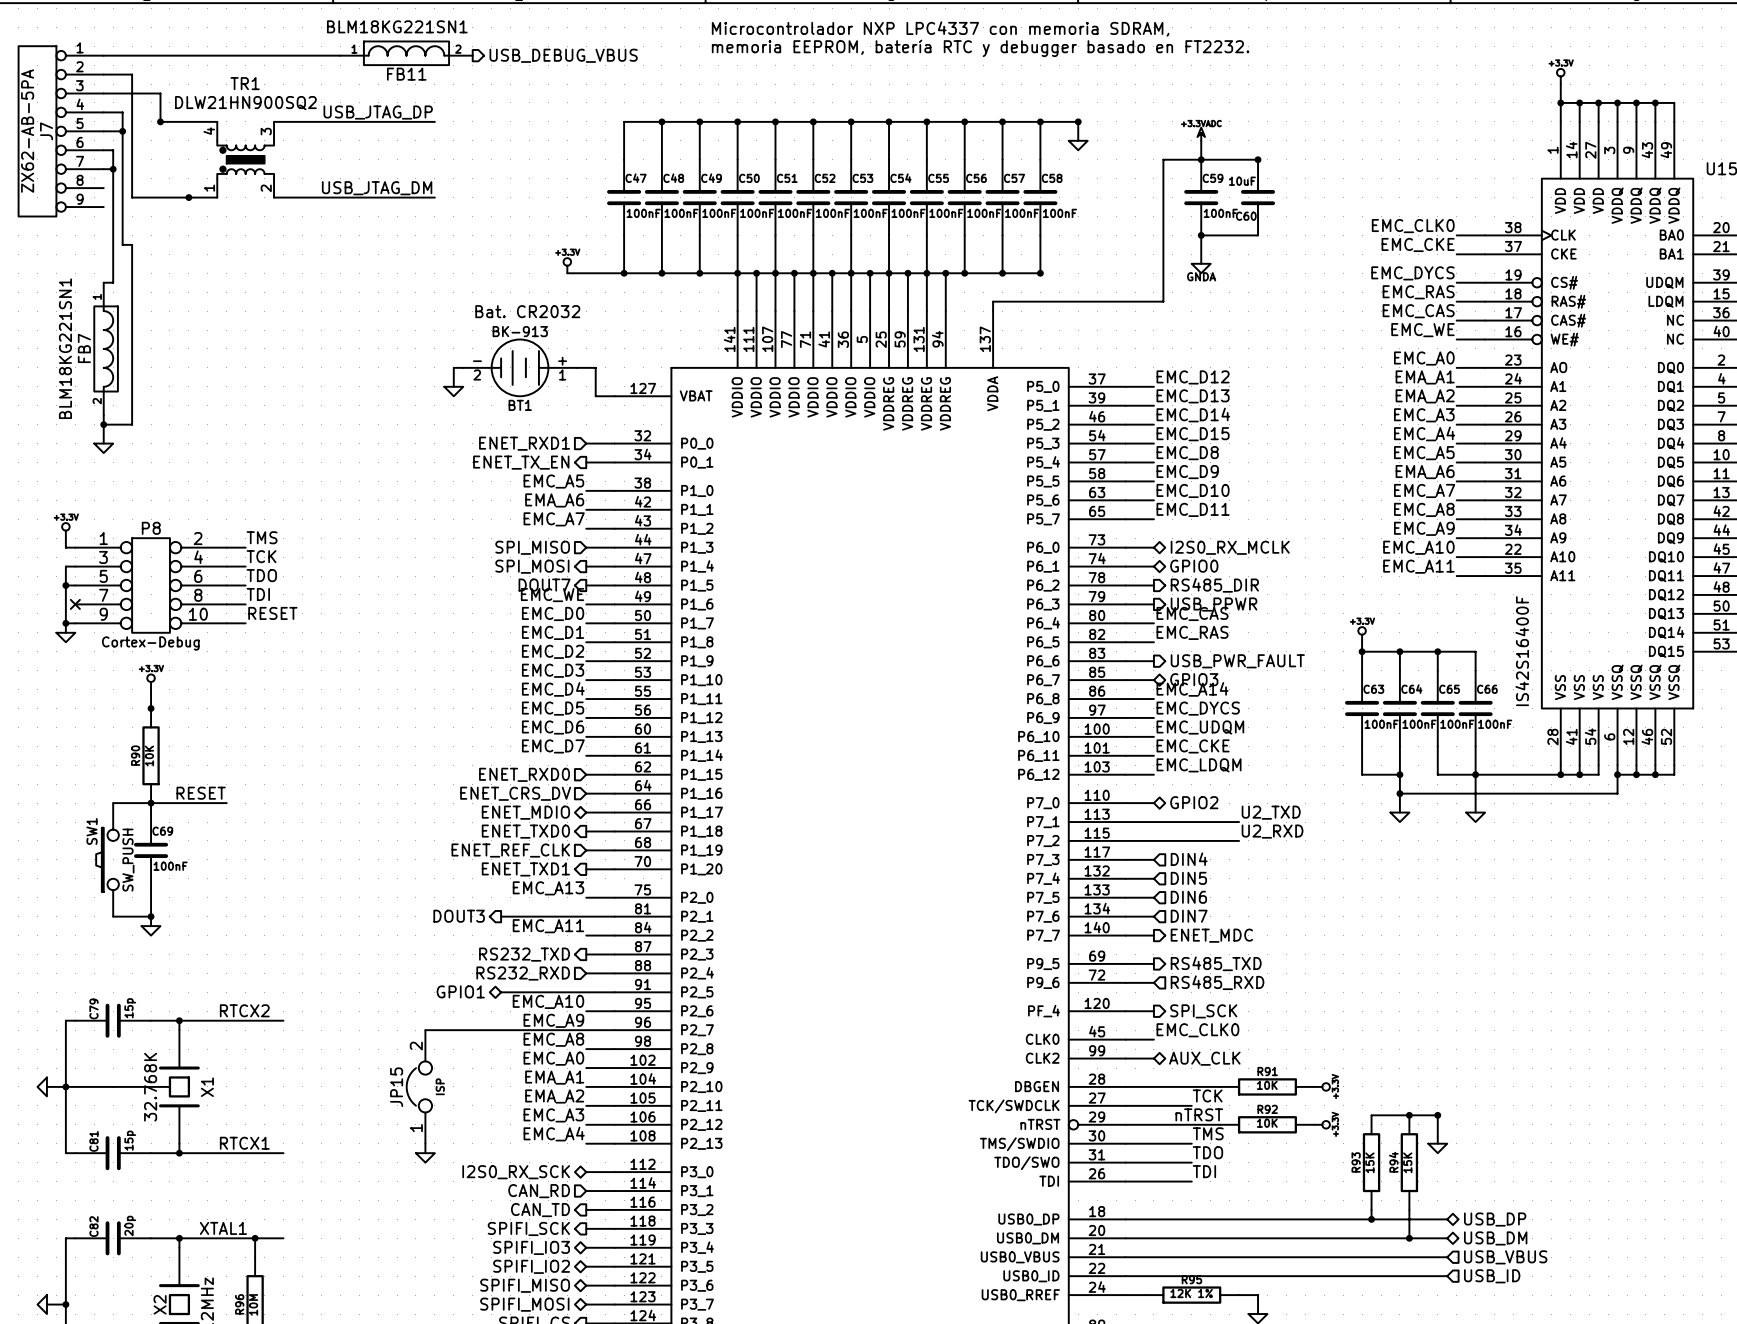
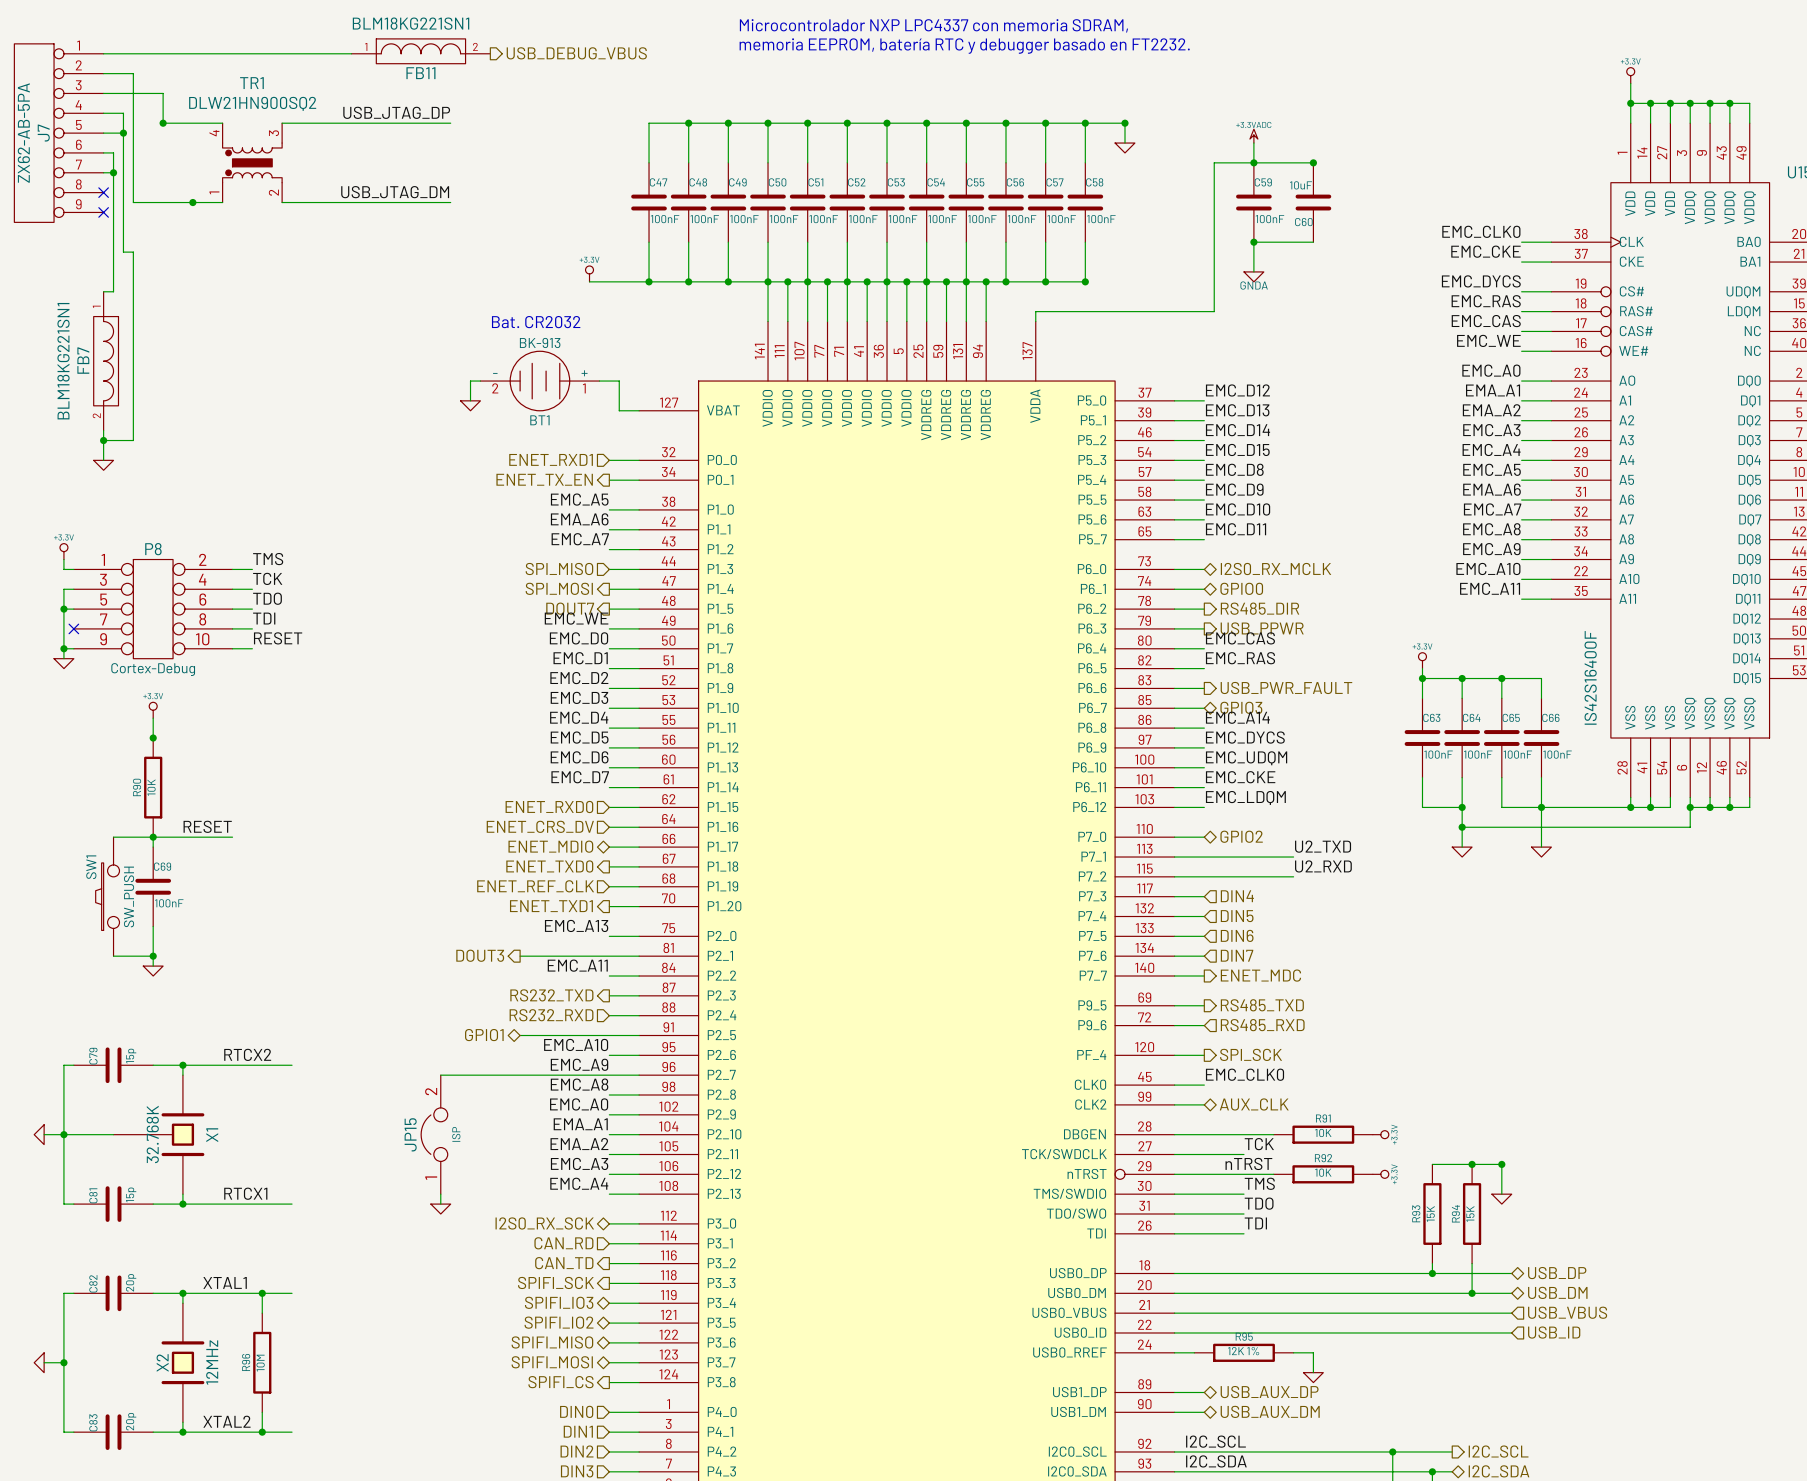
no-connect mark: none -> (103, 192)
no-connect mark: none -> (103, 212)

